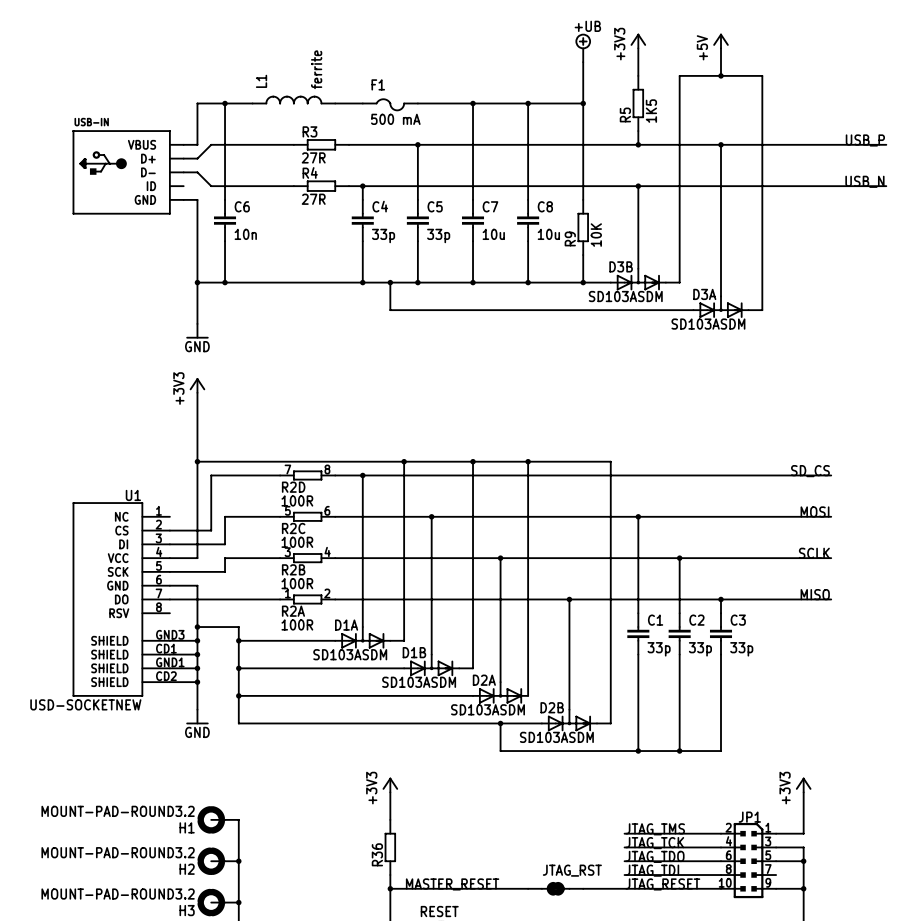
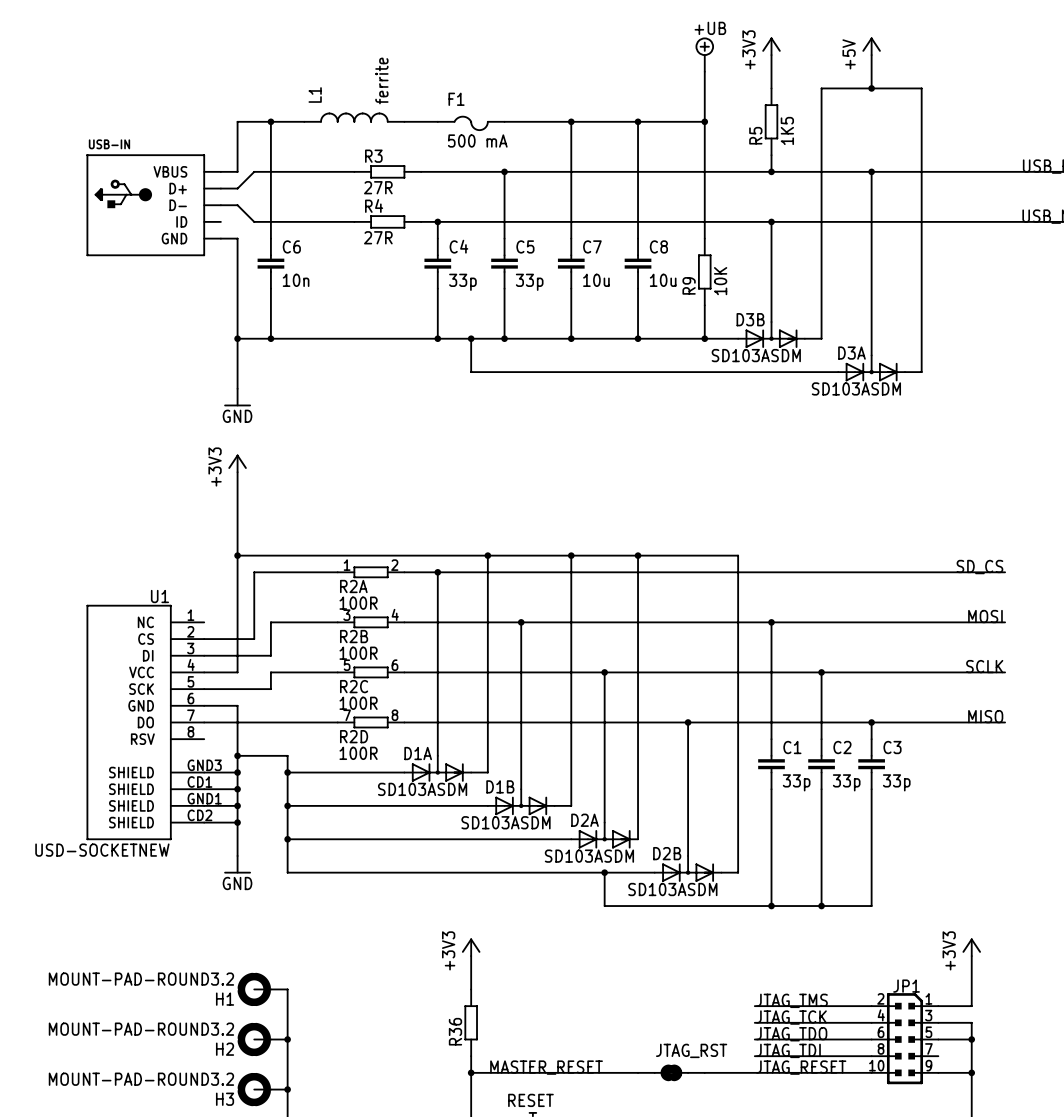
R2D position: (307, 475) -> (371, 722)
R2C position: (307, 516) -> (371, 672)
R2B position: (307, 558) -> (371, 622)
R2A position: (307, 599) -> (371, 572)

